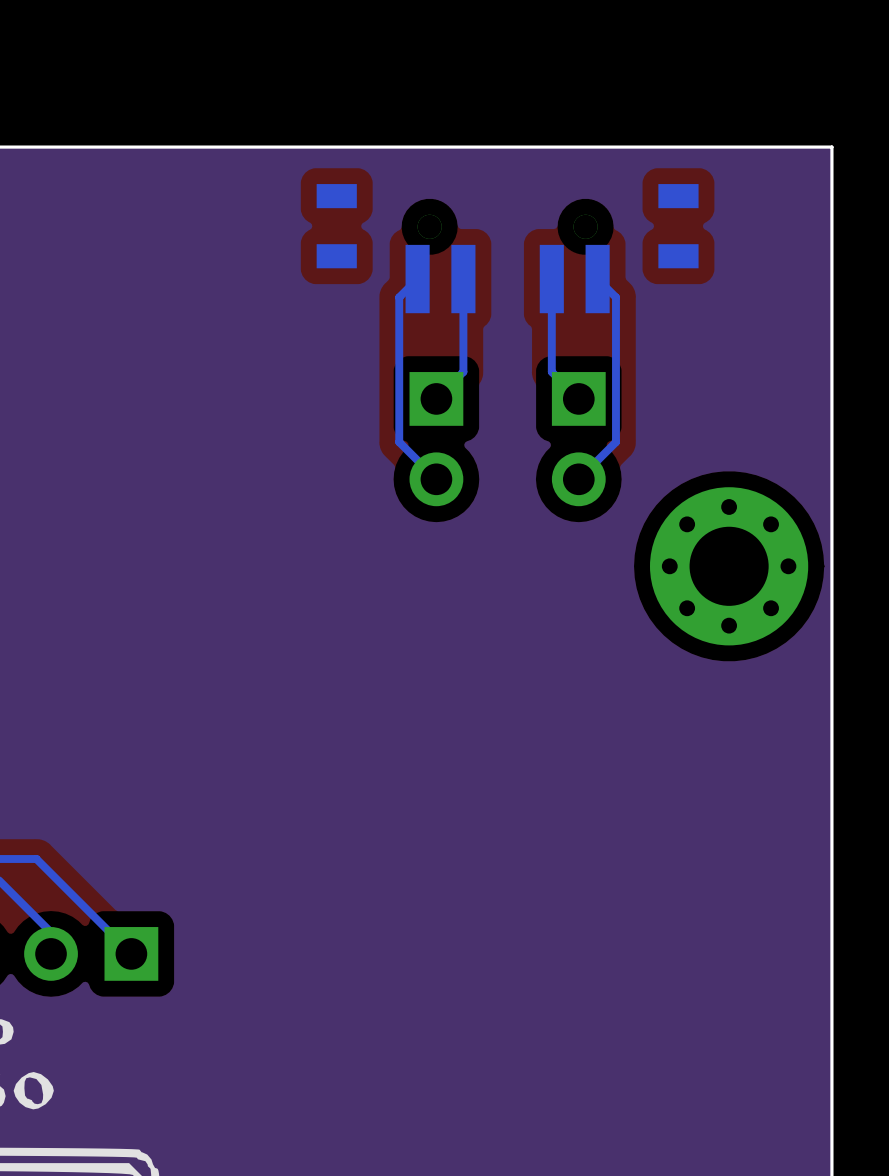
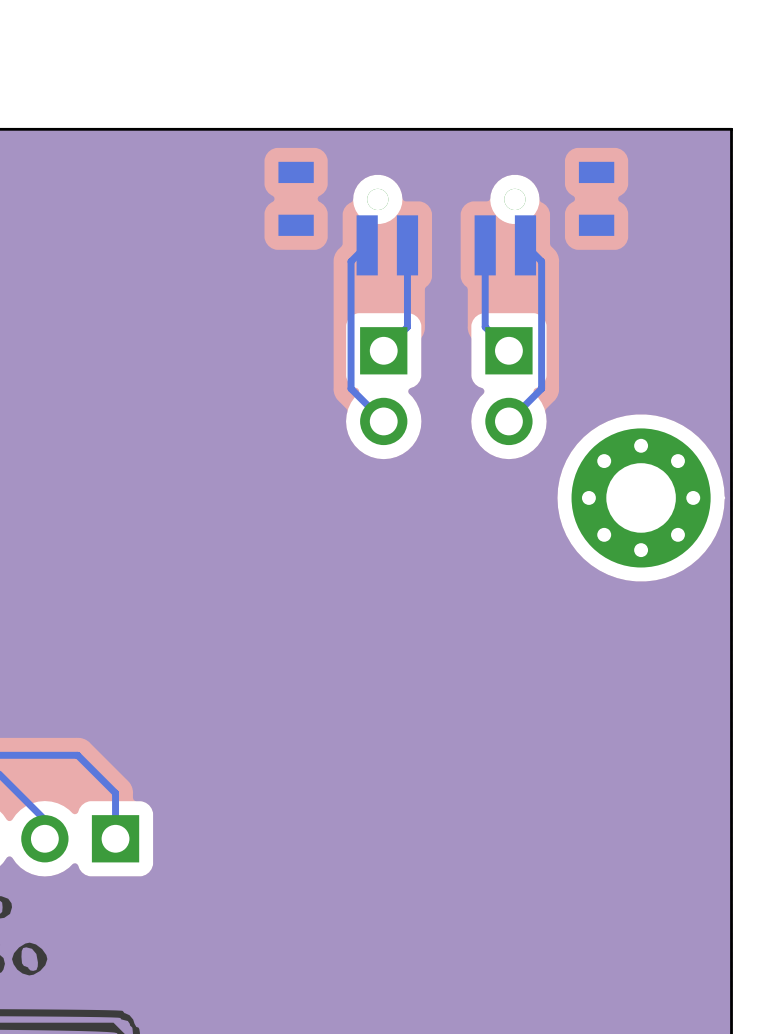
bottom track: (36, 858) (131, 953) -> (32, 755) (77, 755) (115, 793) (115, 838)

